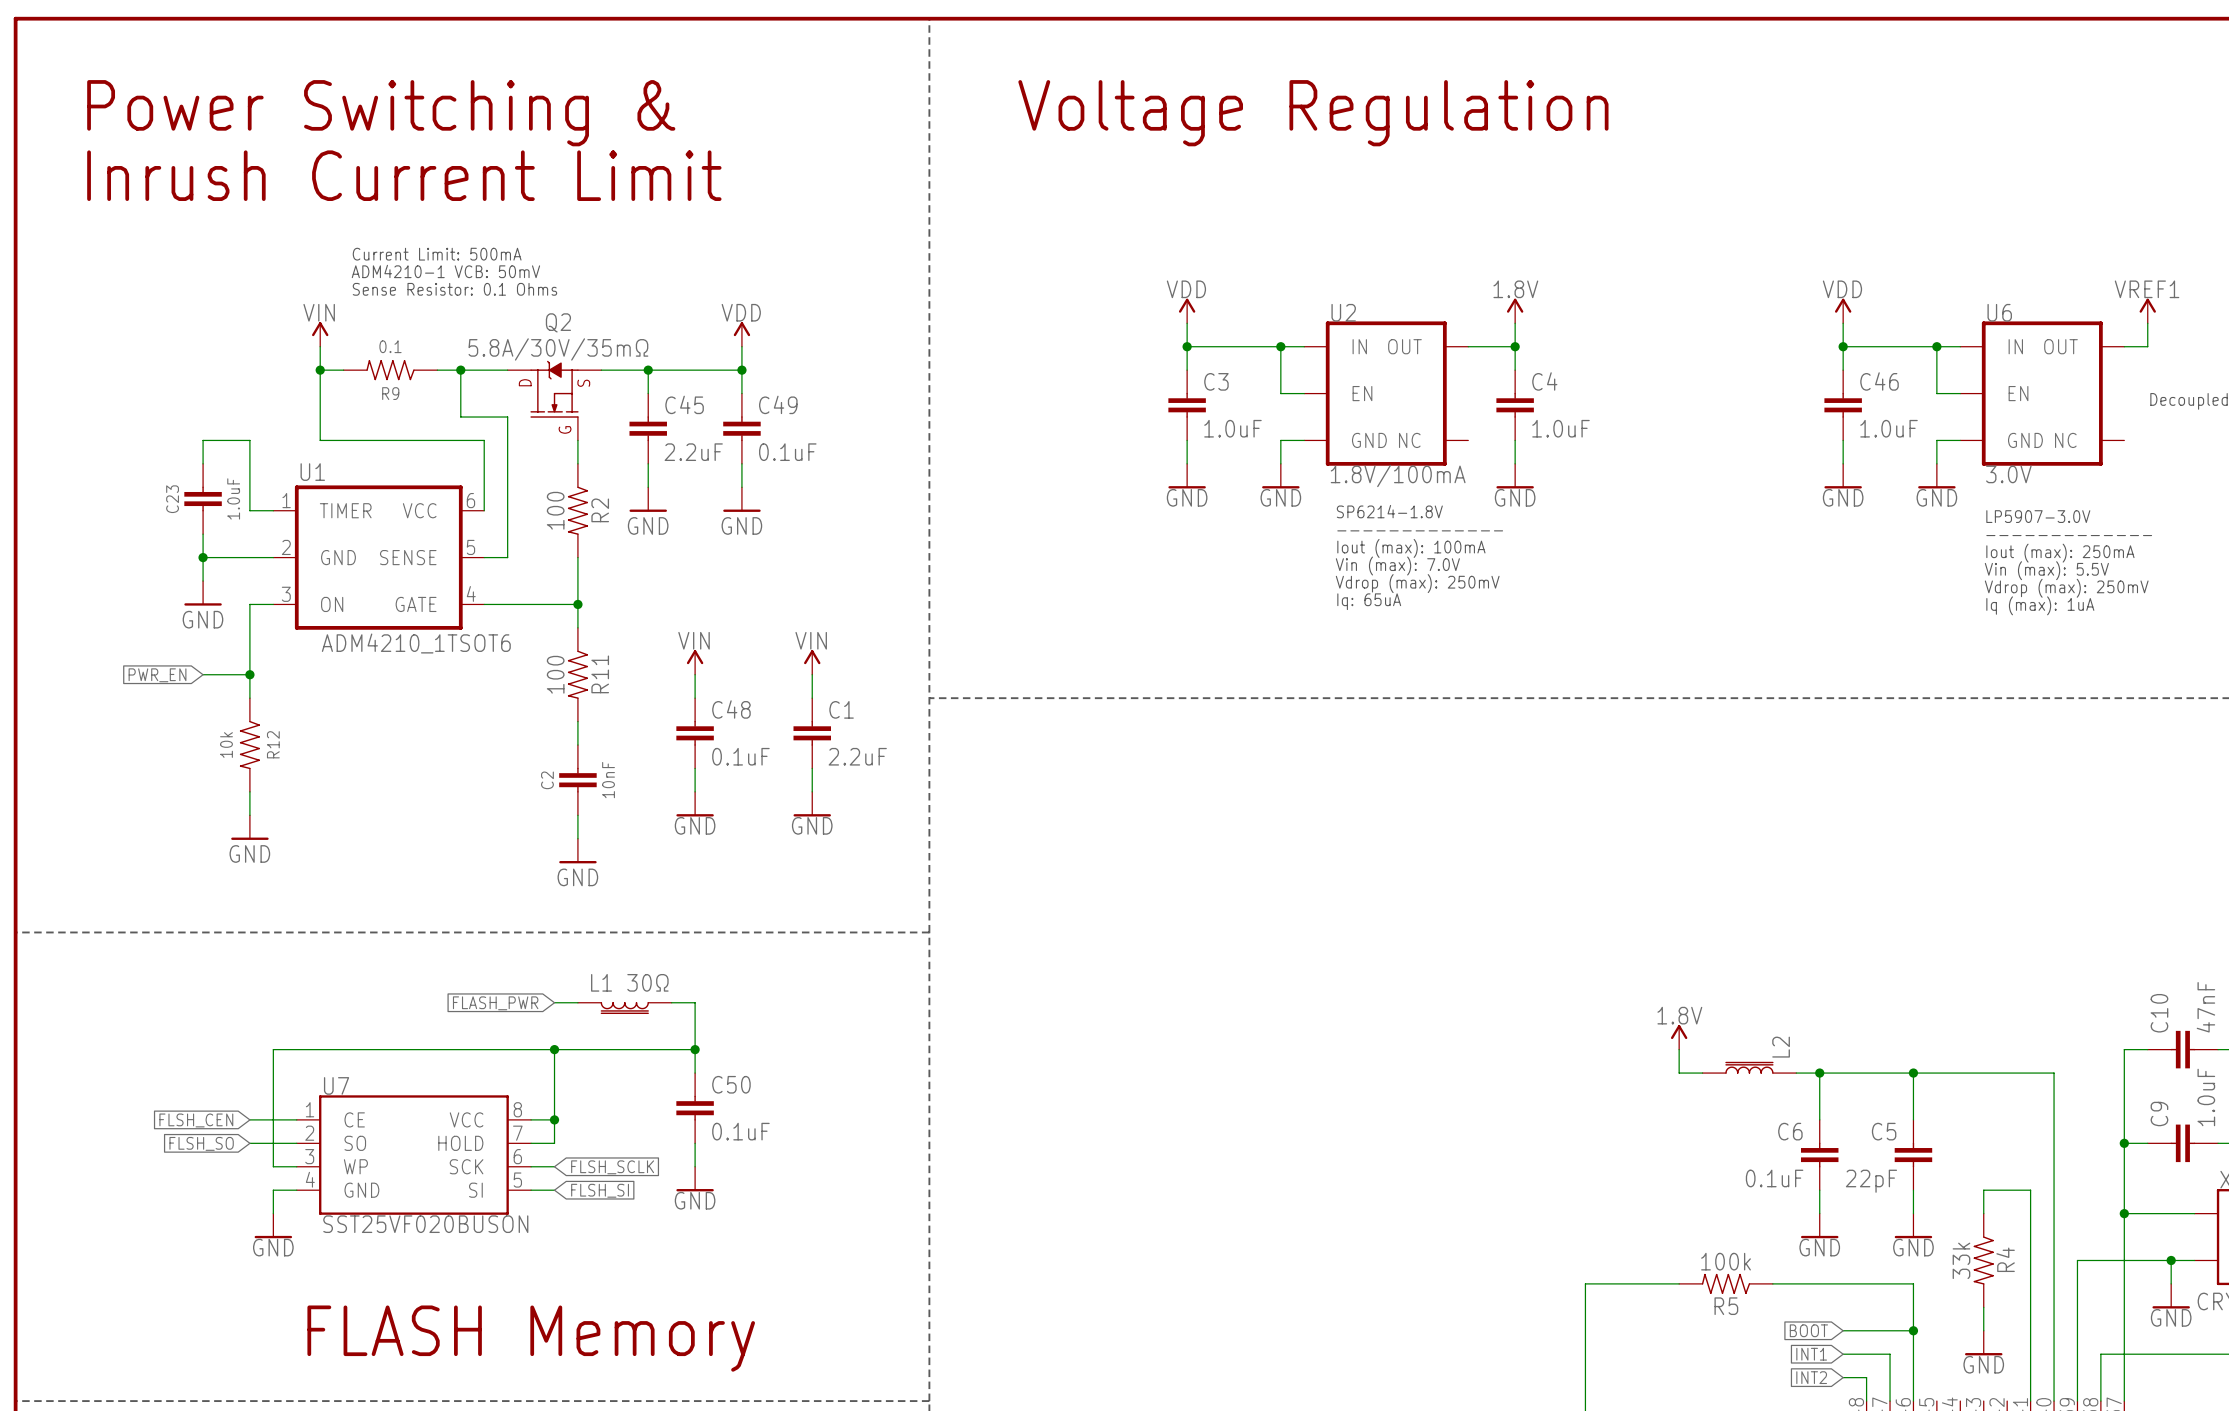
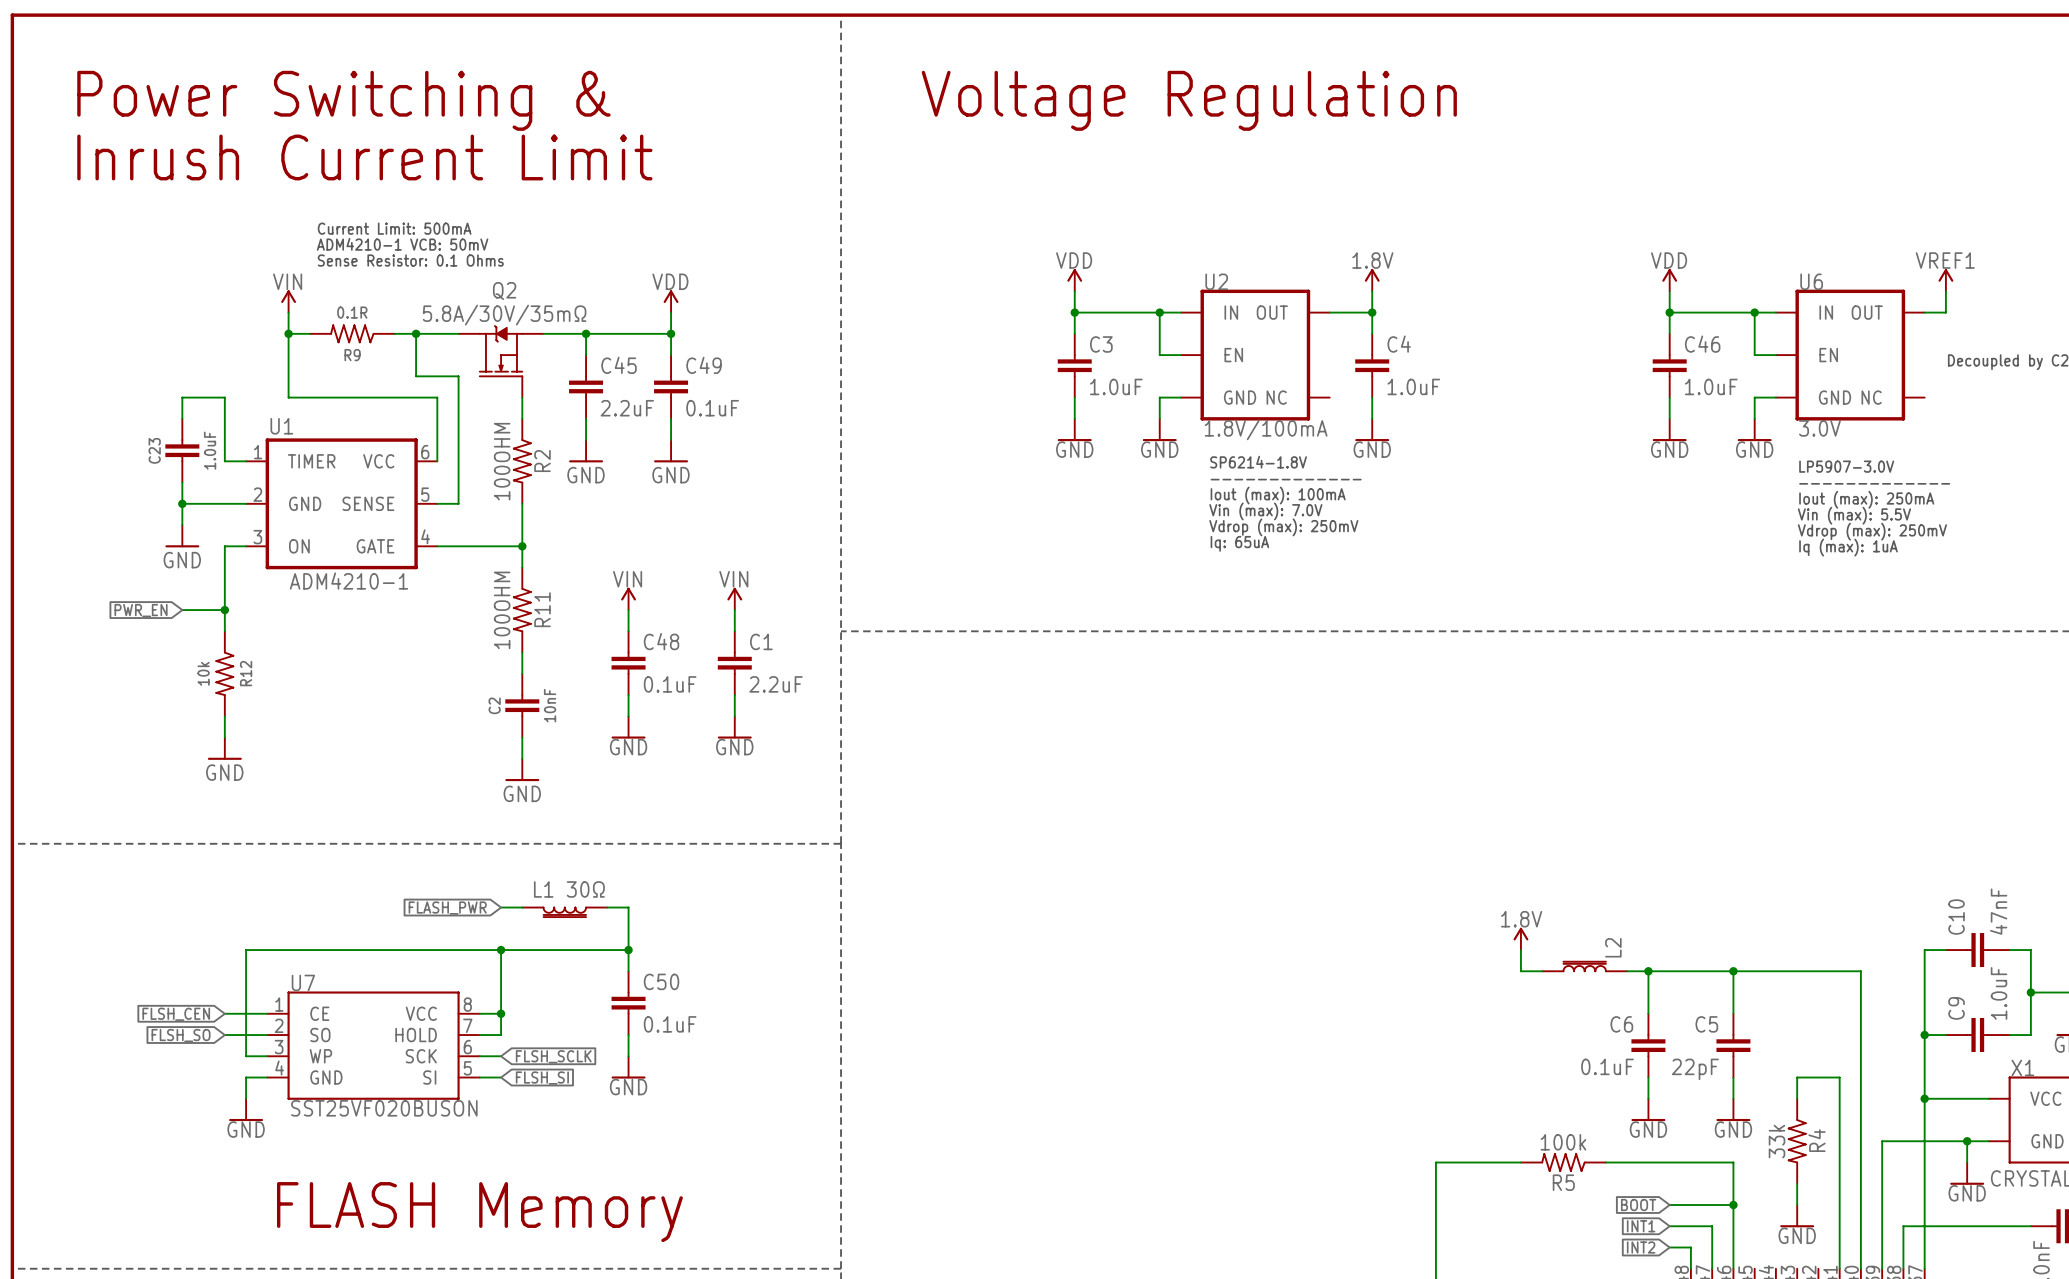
R9 value: 0.1 (390, 346) -> 0.1R (352, 312)
Q2 text: D (525, 382) -> none
Q2 text: S (583, 383) -> none
Q2 text: G (565, 429) -> none
R2 value: 100 (555, 510) -> 100OHM (502, 461)
U1 value: ADM4210_1TSOT6 (416, 643) -> ADM4210-1 (348, 581)
R11 value: 100 (555, 674) -> 100OHM (502, 610)

